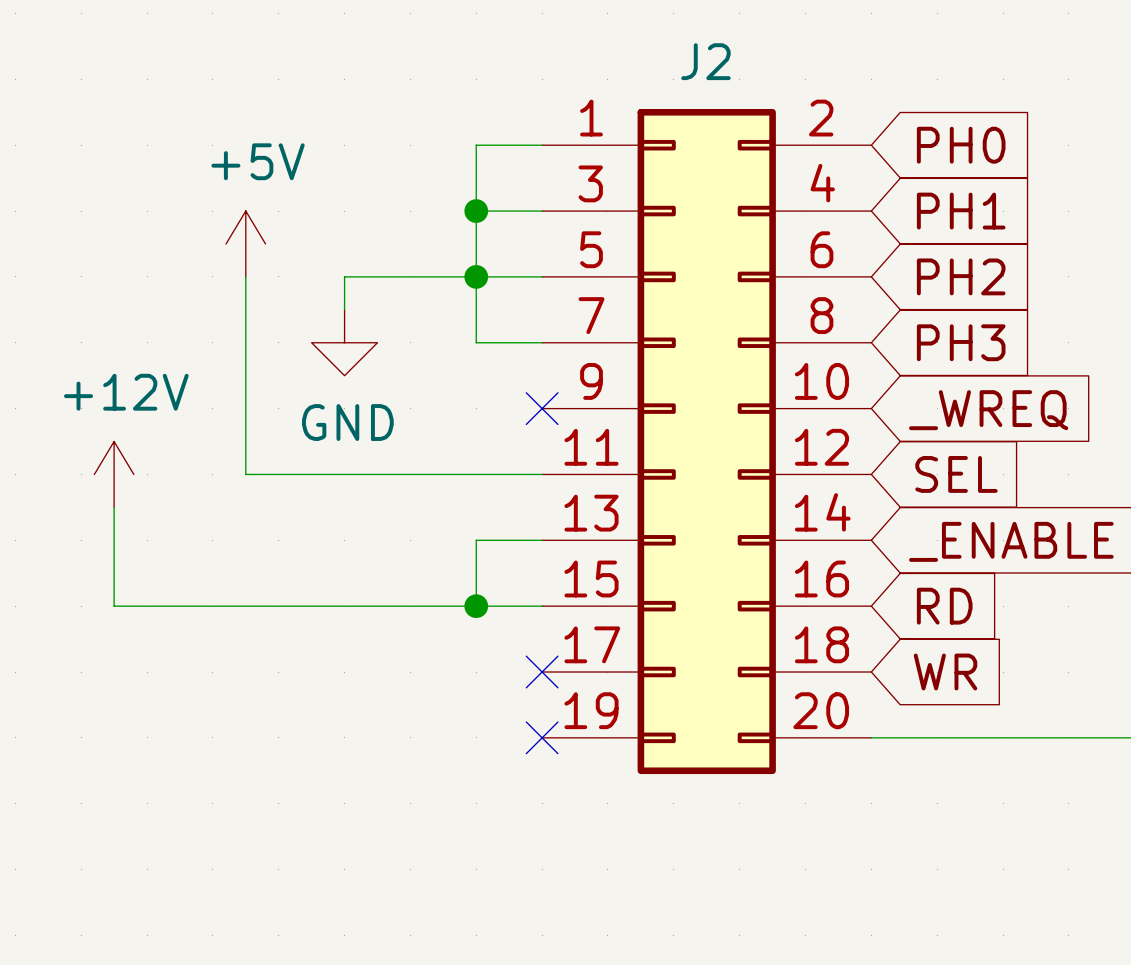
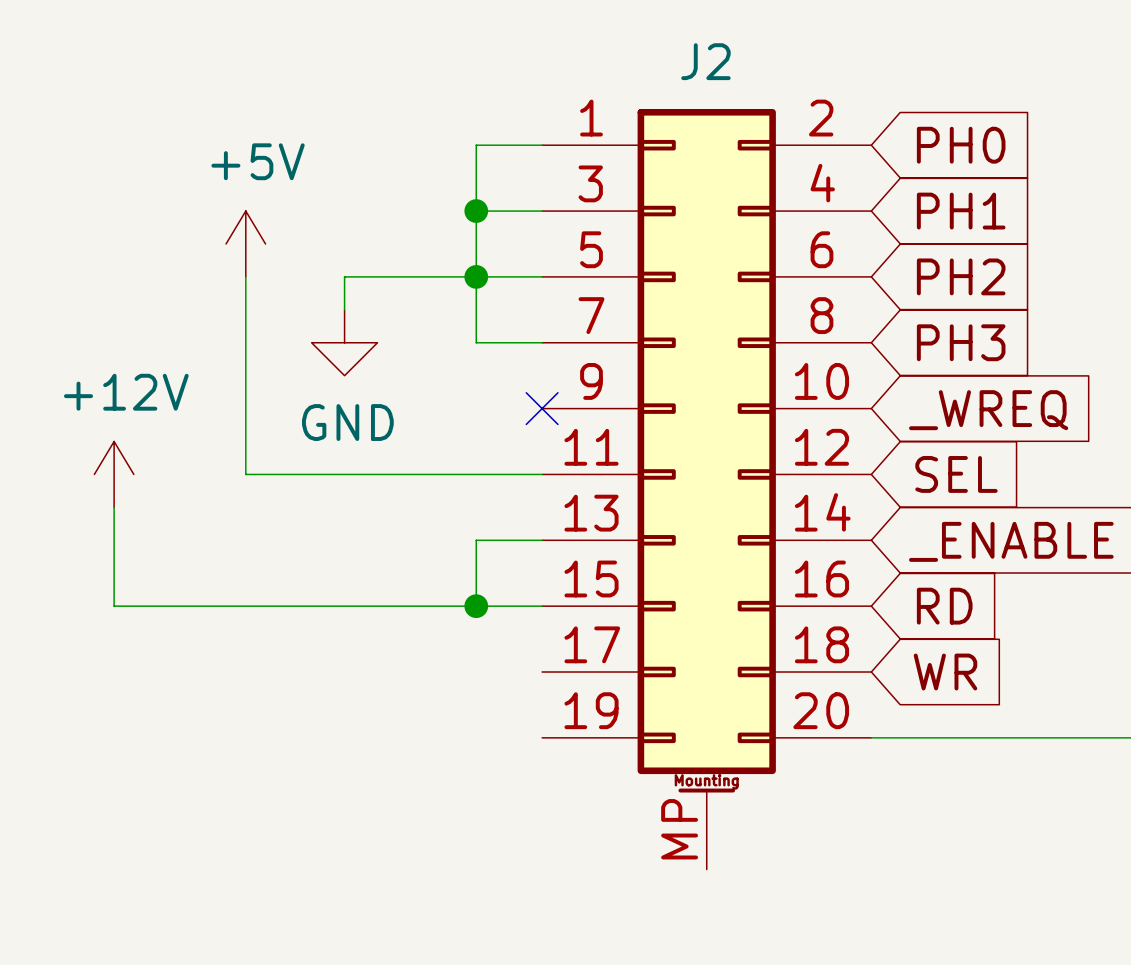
J2 symbol: [542, 108, 872, 775] -> [542, 108, 872, 870]
no-connect mark: (542, 672) -> none
no-connect mark: (542, 737) -> none

